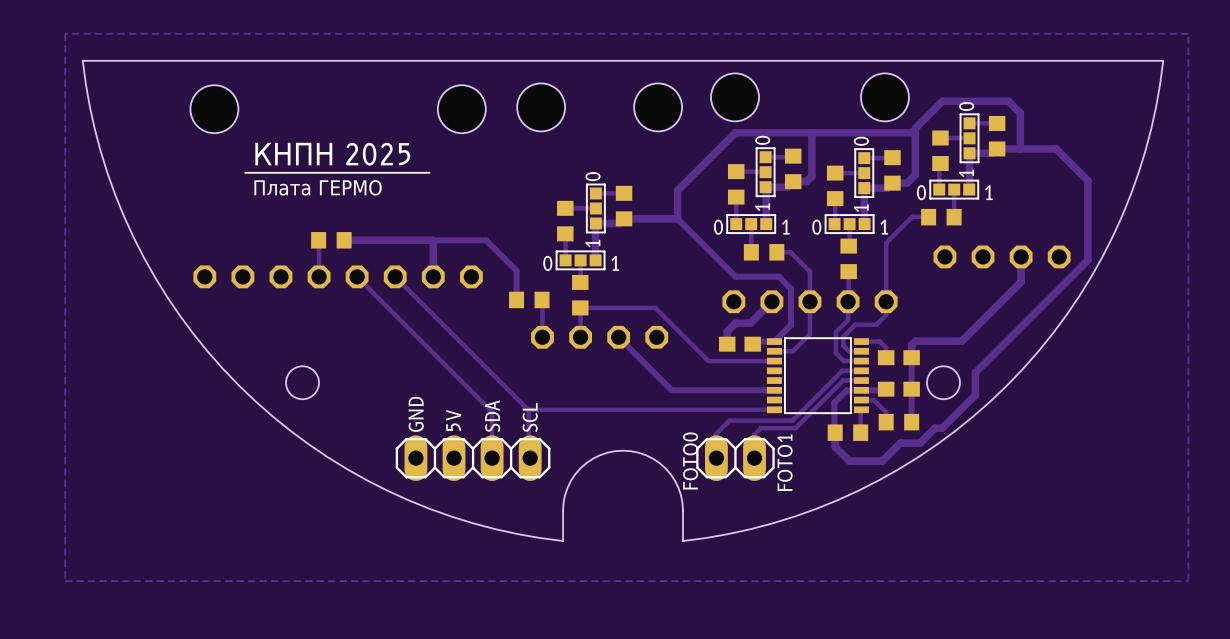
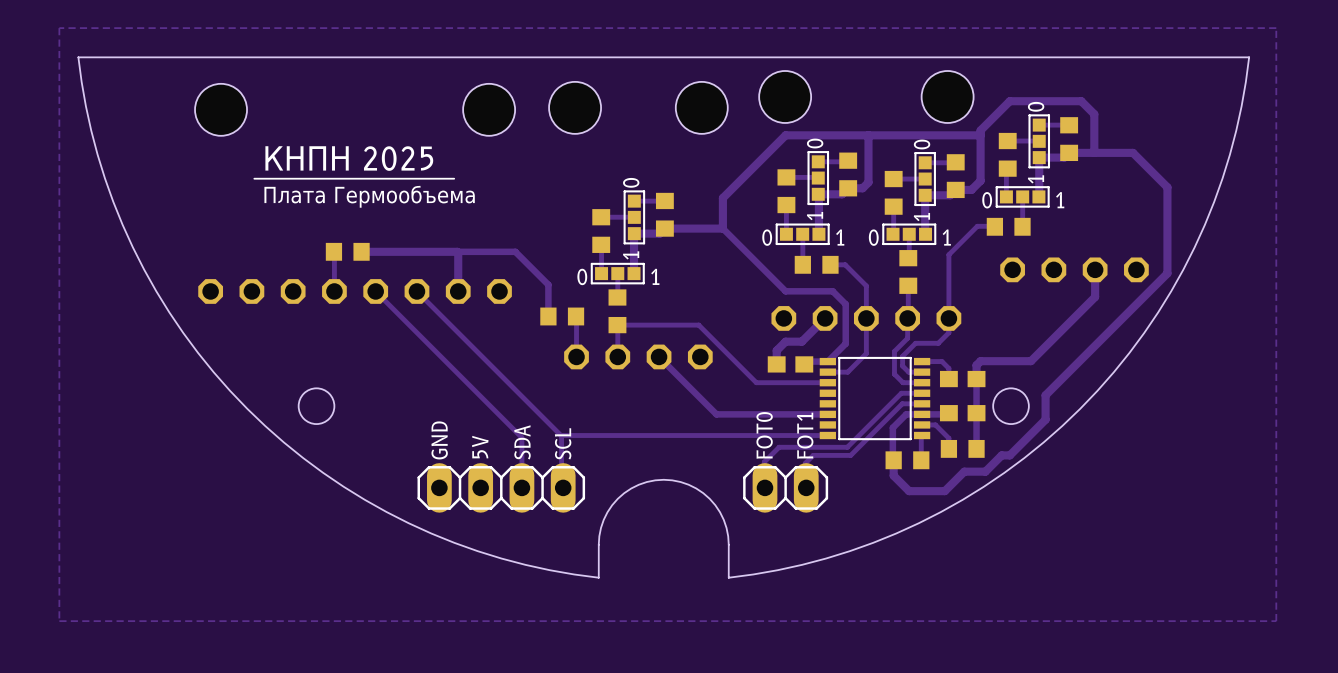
drawing shape: [244, 142, 431, 196] -> [253, 146, 475, 208]
text: FOTO0 (690, 461) -> FOT0 (764, 435)
text: FOTO1 (785, 462) -> FOT1 (805, 435)

